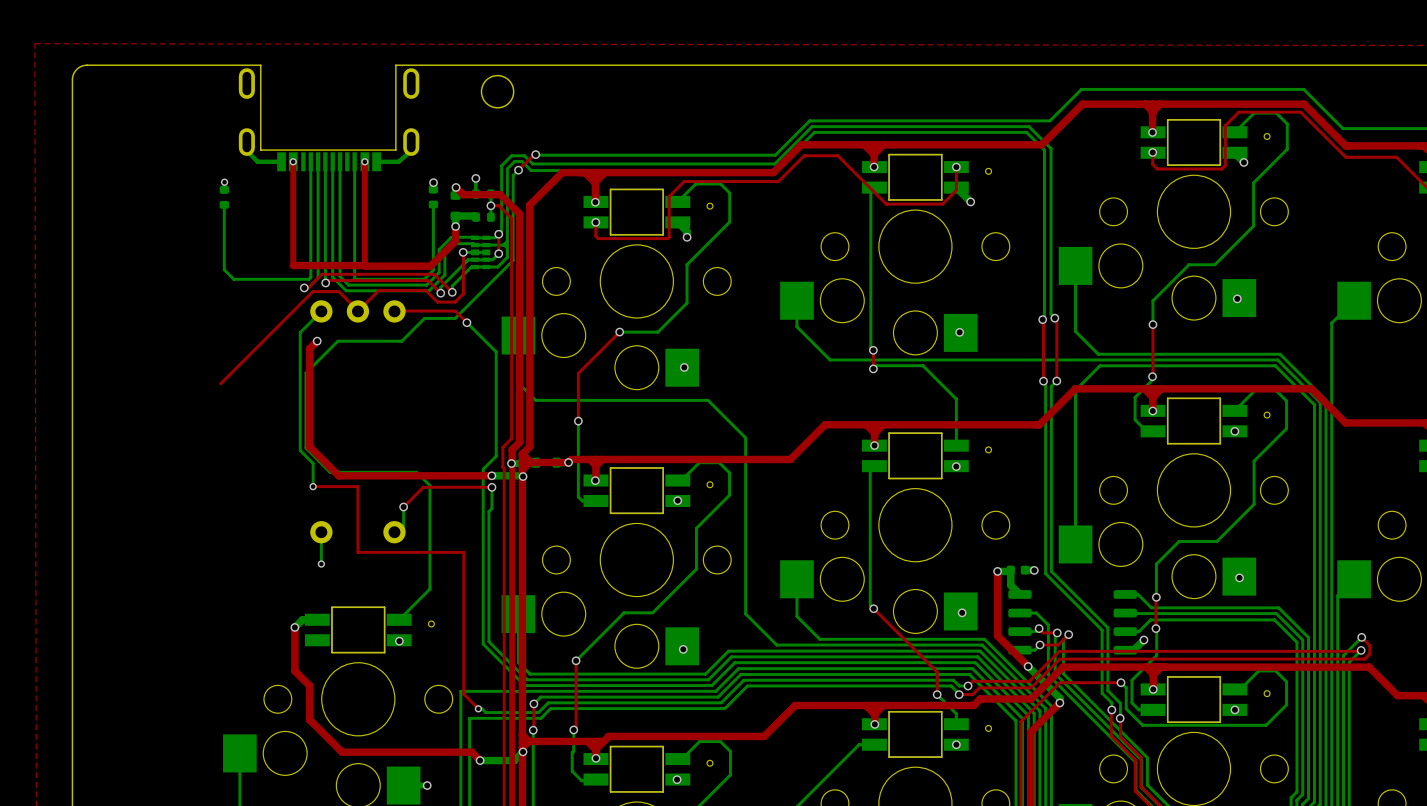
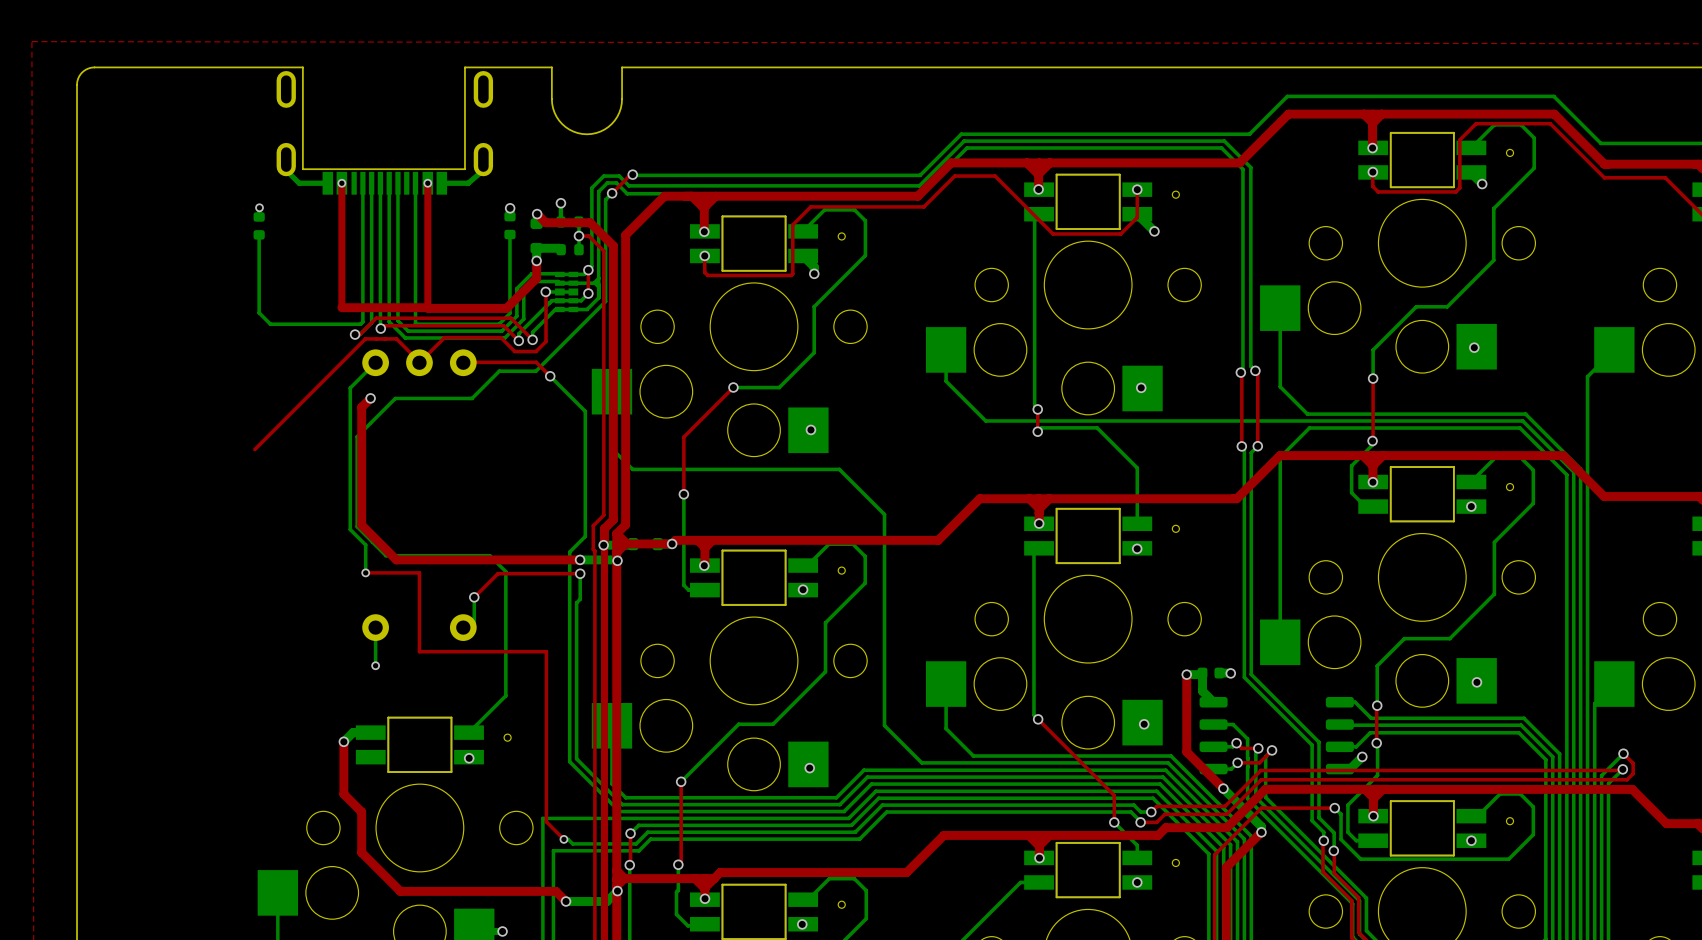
board edge: (468, 65) (526, 65) -> (551, 67) (552, 103) (556, 116) (569, 129) (586, 134) (604, 129) (617, 116) (621, 103) (622, 67)
round board edge: [480, 74, 515, 109] -> none

